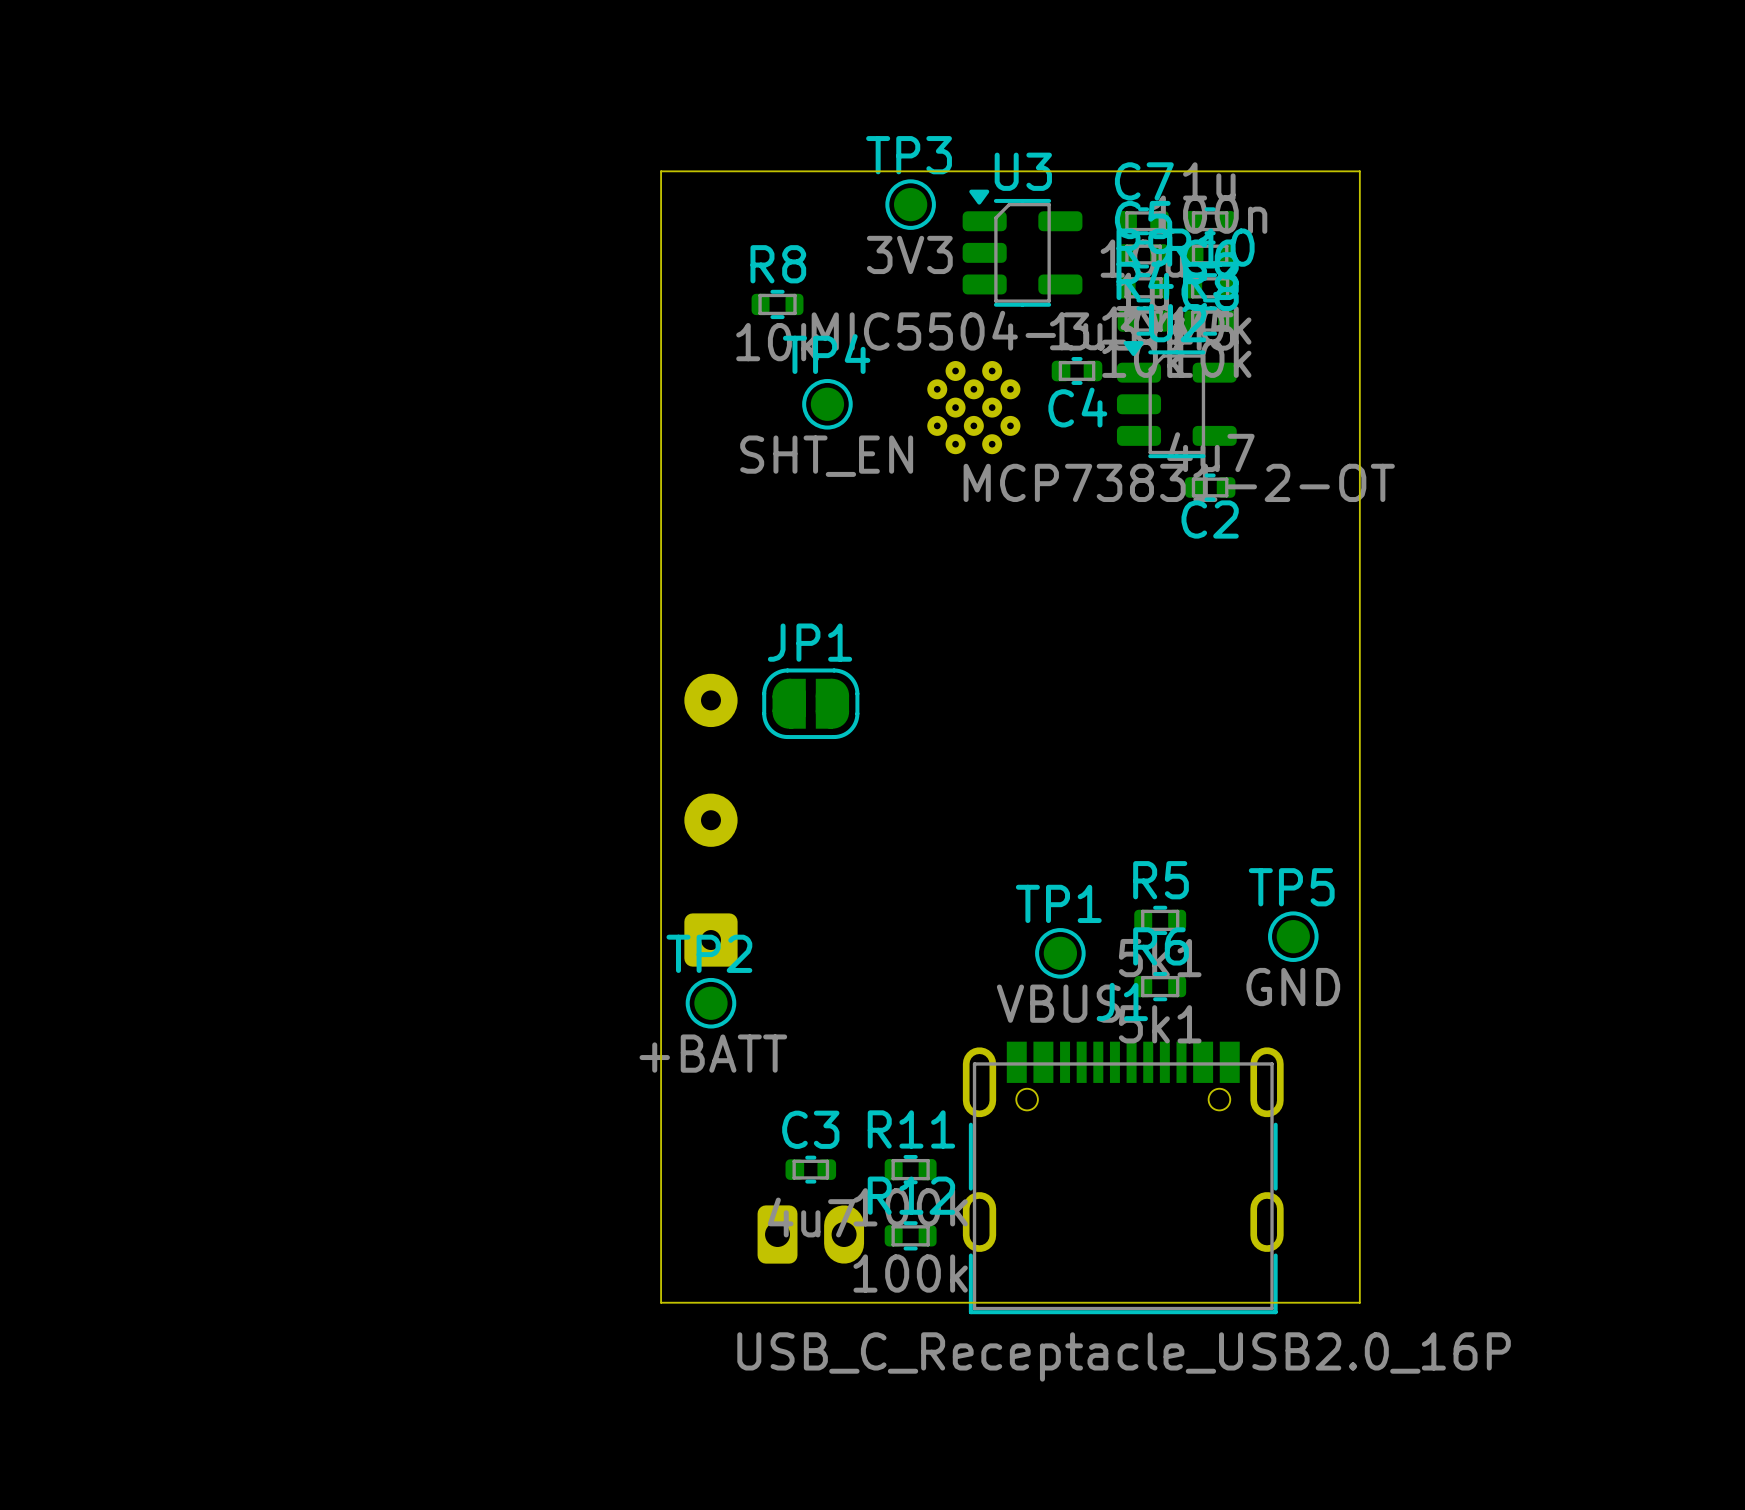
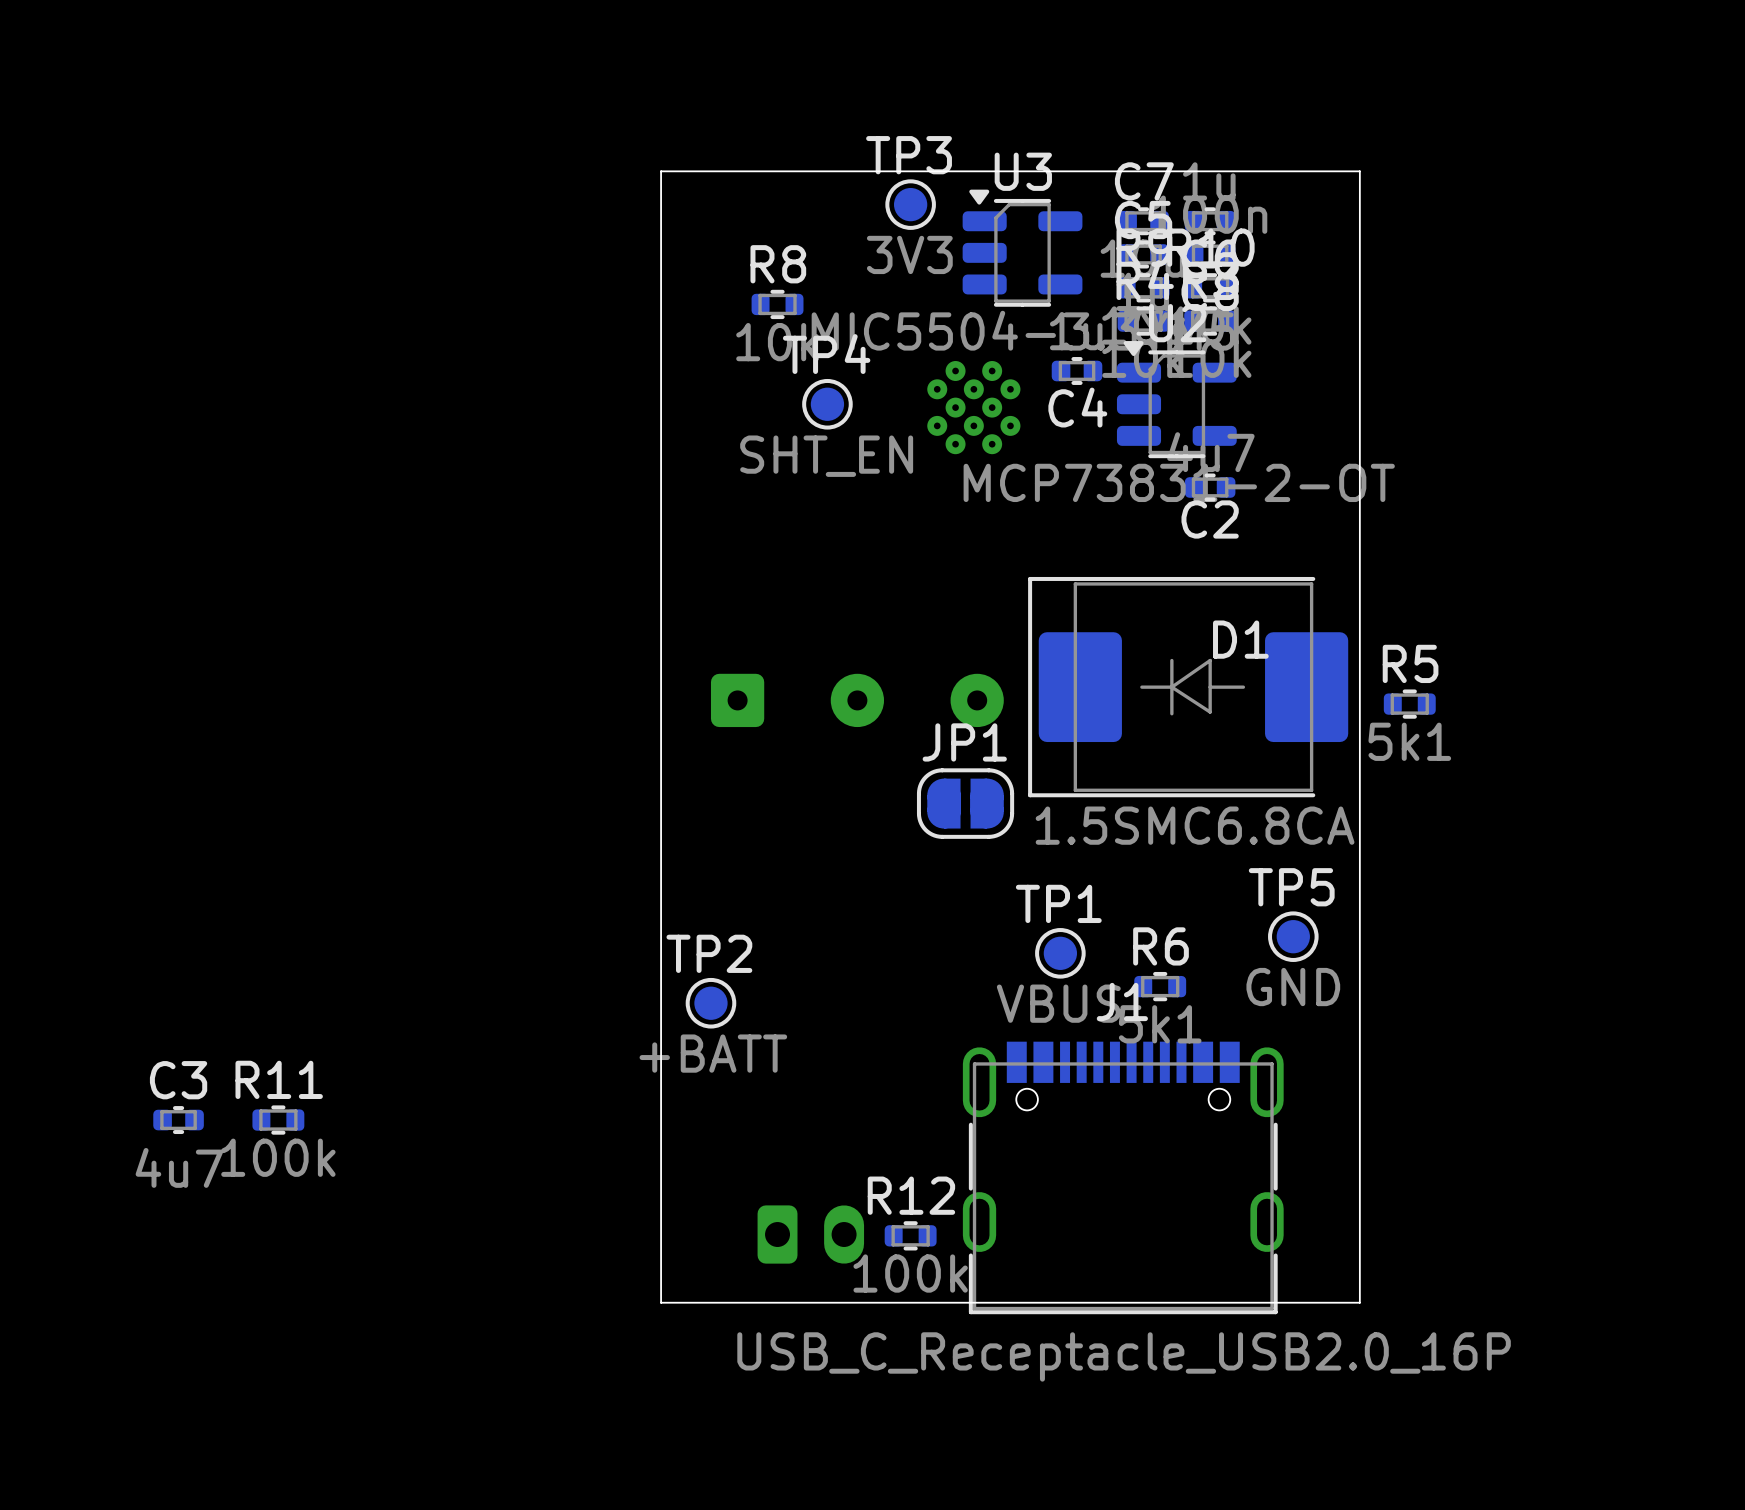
D1: none -> 1.5SMC6.8CA (1188, 687)
JP1 position: (810, 703) -> (965, 803)
part rotation: 0° (710, 820) -> 90° clockwise (857, 700)
part position: (710, 820) -> (857, 700)
R5 position: (1160, 920) -> (1409, 704)
C3 position: (810, 1169) -> (178, 1120)
R11 position: (910, 1169) -> (278, 1120)

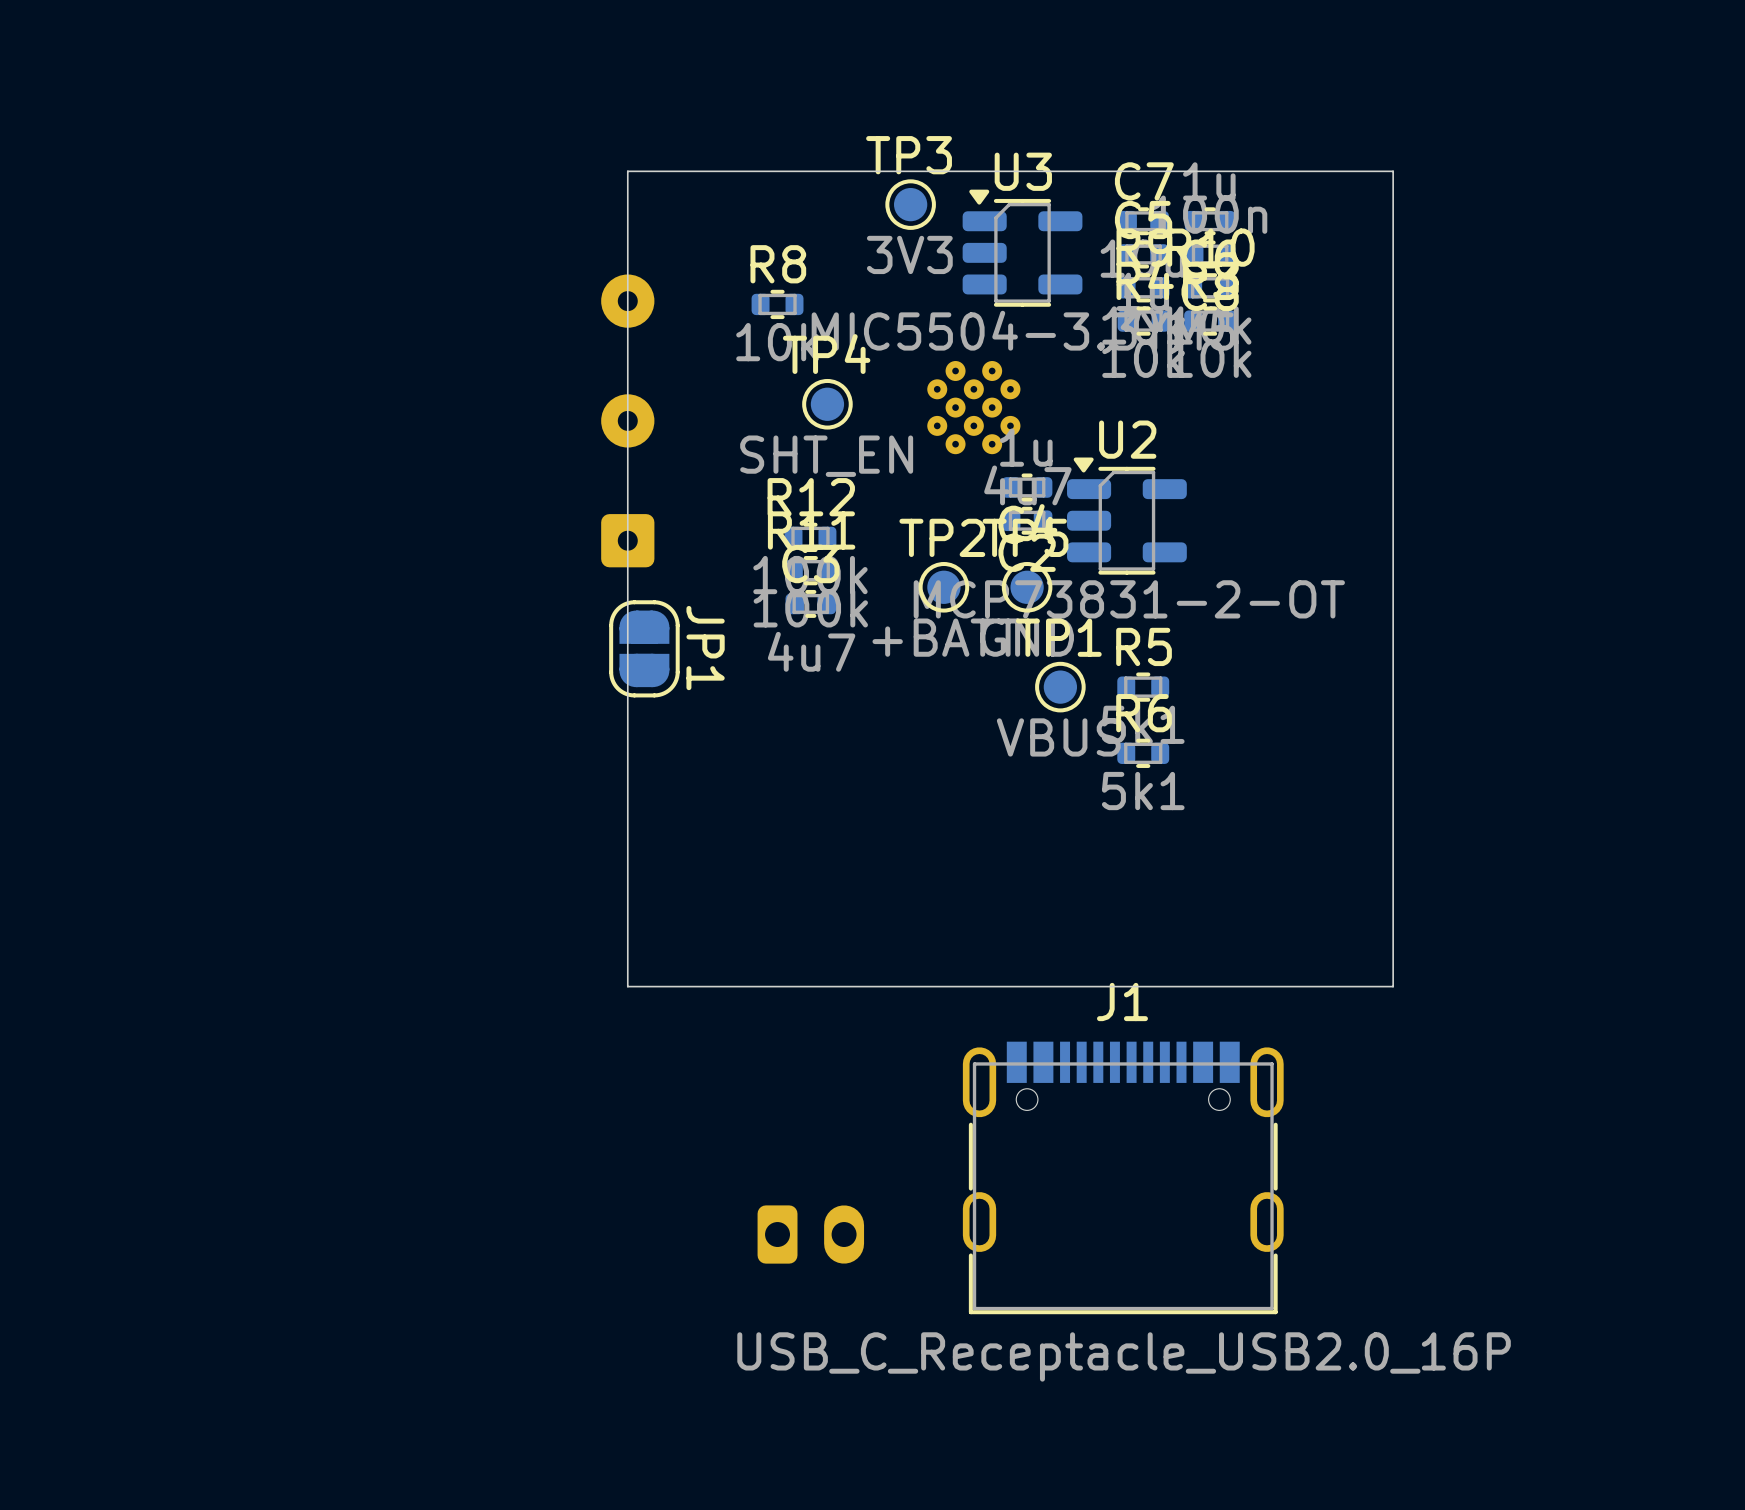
board edge: (1359, 171) (1359, 1302) (661, 1302) (661, 171) -> (1359, 171) (1393, 171) (1393, 986) (627, 986) (627, 171) (661, 171)
C4 position: (1077, 370) -> (1027, 487)
U2 position: (1176, 399) -> (1126, 516)
C2 position: (1210, 487) -> (1027, 520)
D1: 1.5SMC6.8CA (1188, 687) -> none
part rotation: 0° (857, 700) -> 90° counterclockwise (627, 420)
part position: (857, 700) -> (627, 420)
R5 position: (1409, 704) -> (1143, 687)
JP1 rotation: 0° (965, 803) -> 90° clockwise (644, 648)
JP1 position: (965, 803) -> (644, 648)
TP5 position: (1293, 936) -> (1027, 587)
TP1 position: (1060, 953) -> (1060, 687)
R6 position: (1160, 986) -> (1143, 753)
TP2 position: (710, 1003) -> (943, 587)
C3 position: (178, 1120) -> (810, 603)
R11 position: (278, 1120) -> (810, 570)
R12 position: (910, 1235) -> (810, 537)

